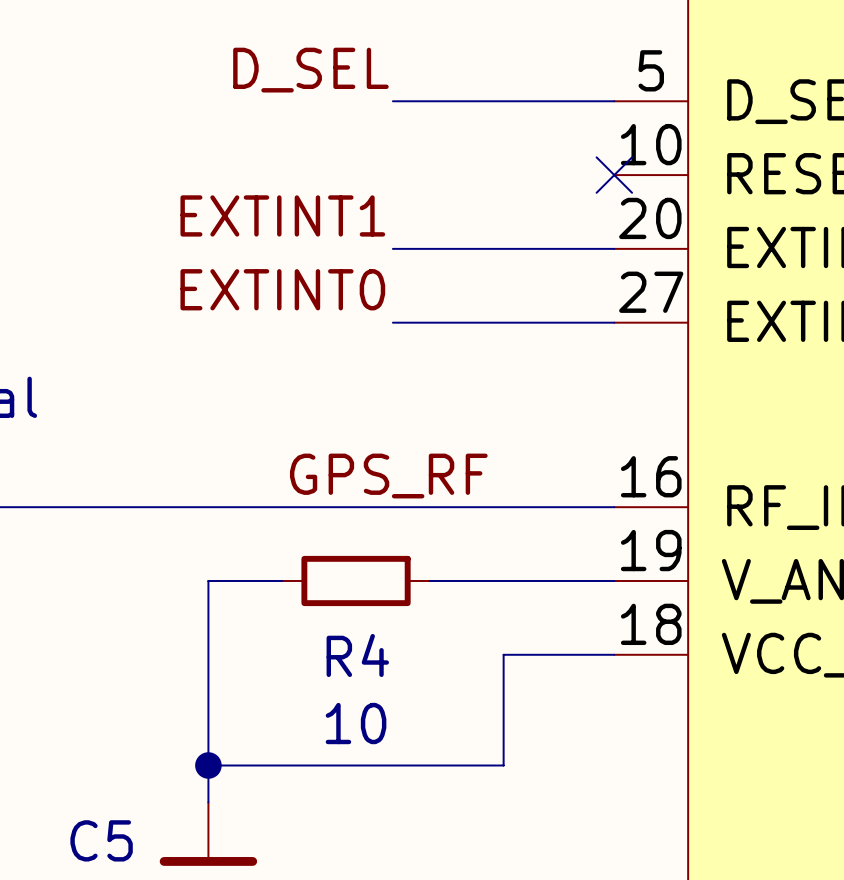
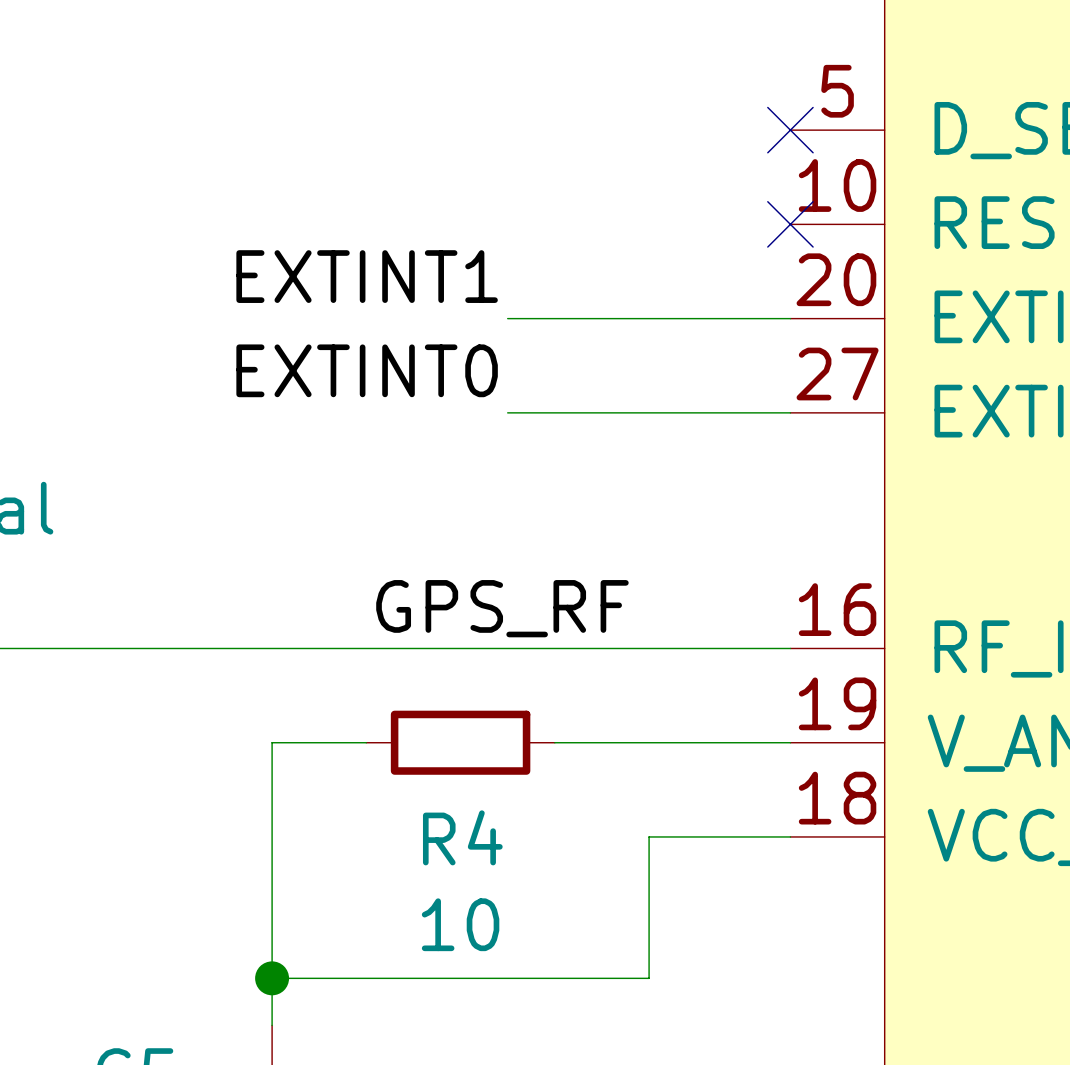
label: D_SEL (310, 70) -> none
wire: (392, 101) (614, 101) -> none
no-connect mark: none -> (790, 130)

